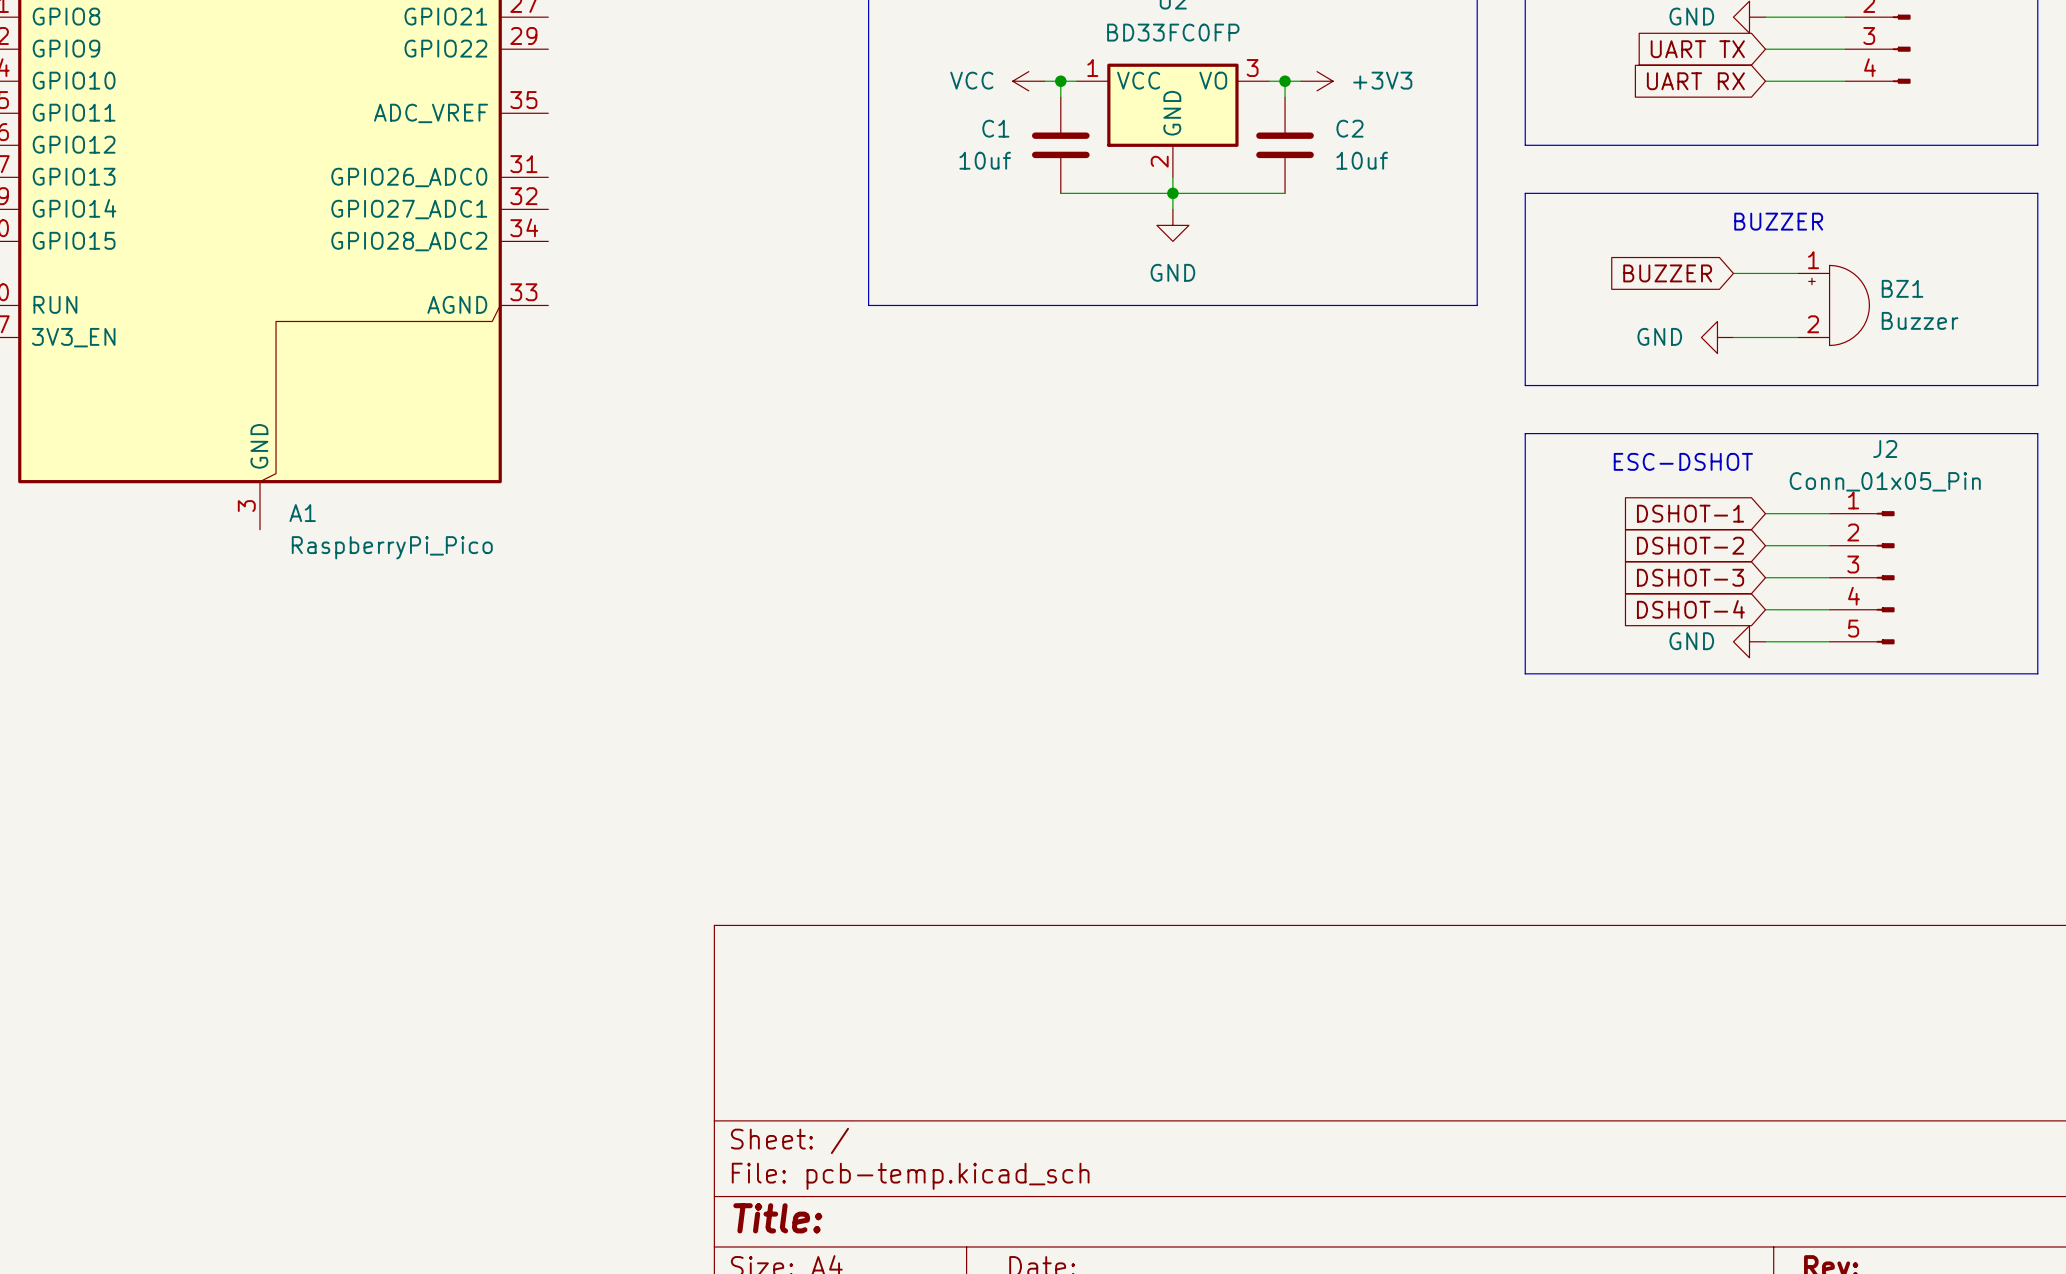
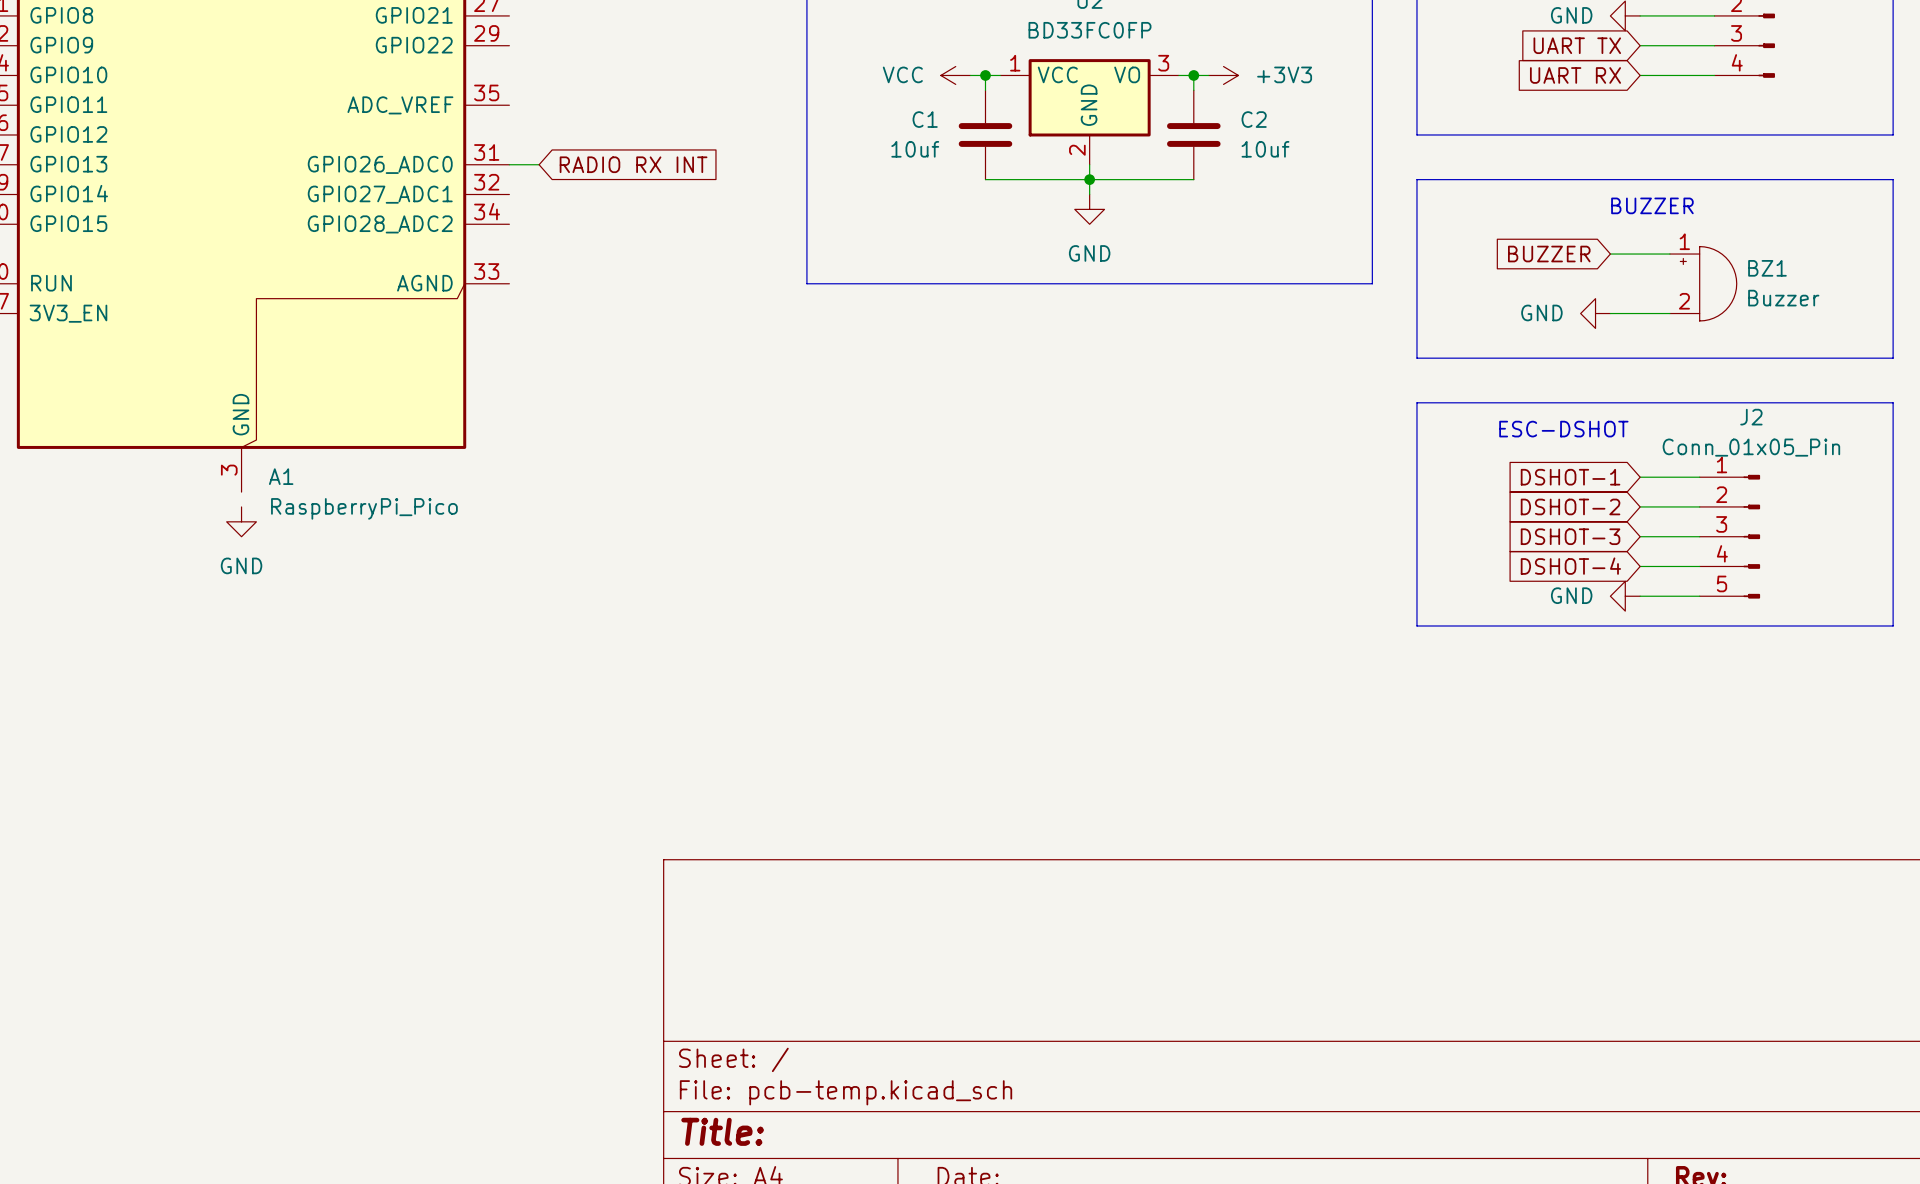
wire: none -> (509, 164) (539, 164)
global label: none -> RADIO RX INT (633, 164)
power symbol: none -> GND (241, 521)

